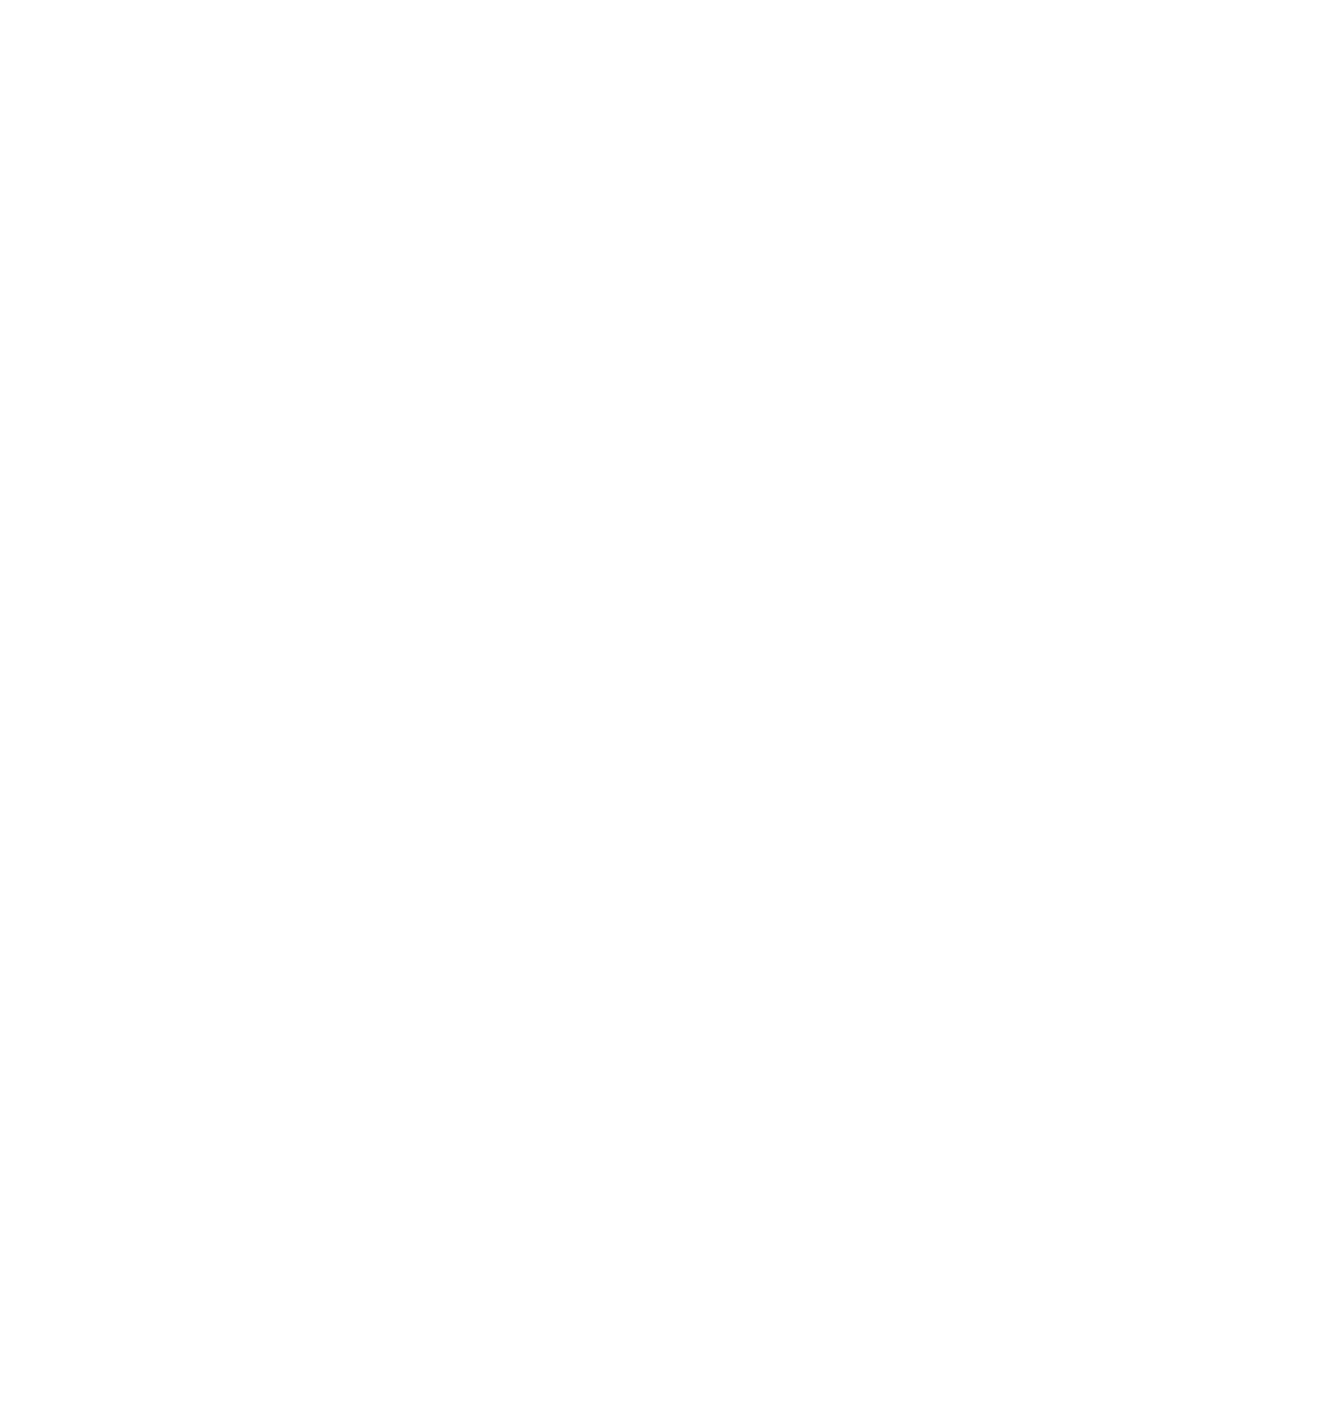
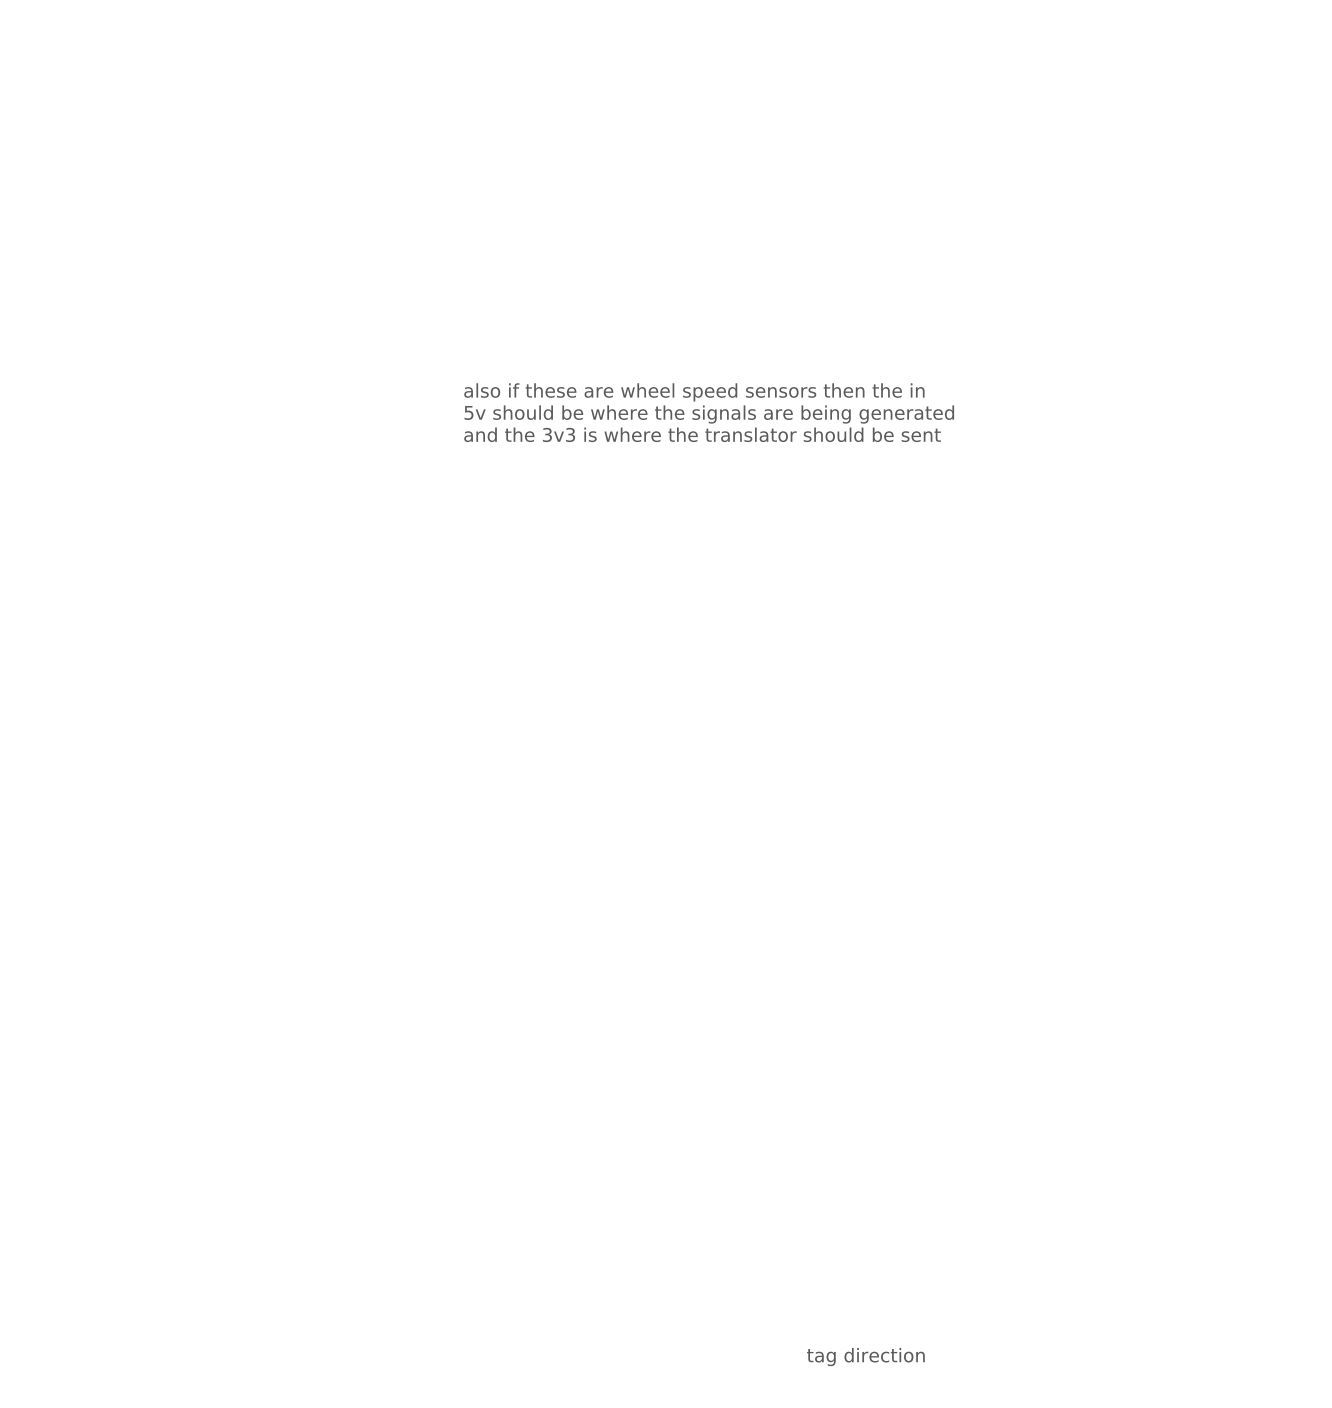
text: none -> also if these are wheel speed sensors then the in (694, 392)
text: none -> 5v should be where the signals are being generated (709, 414)
text: none -> and the 3v3 is where the translator should be sent (702, 434)
text: none -> tag direction (865, 1357)

